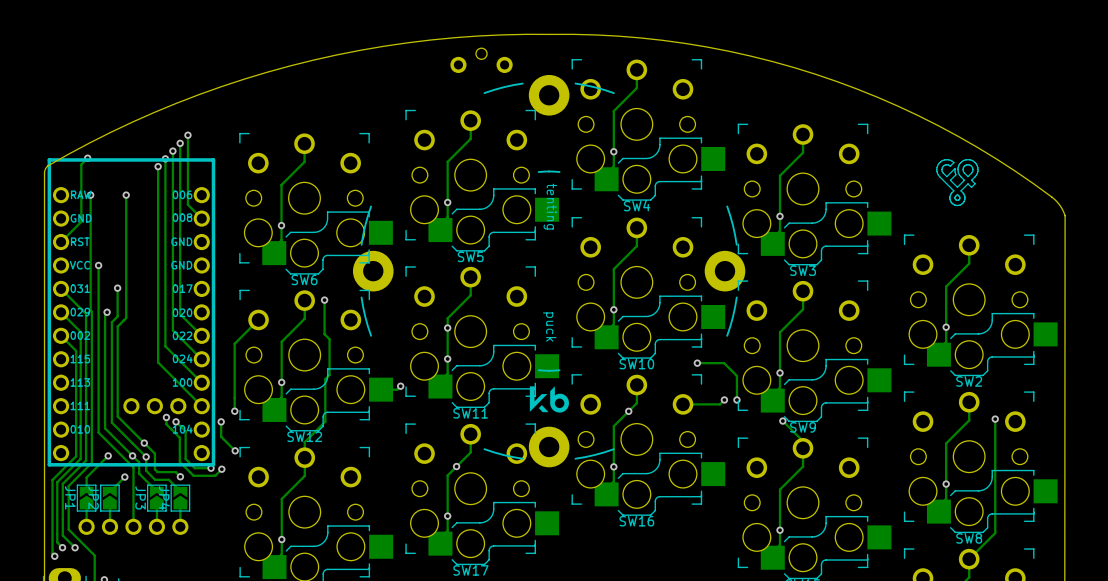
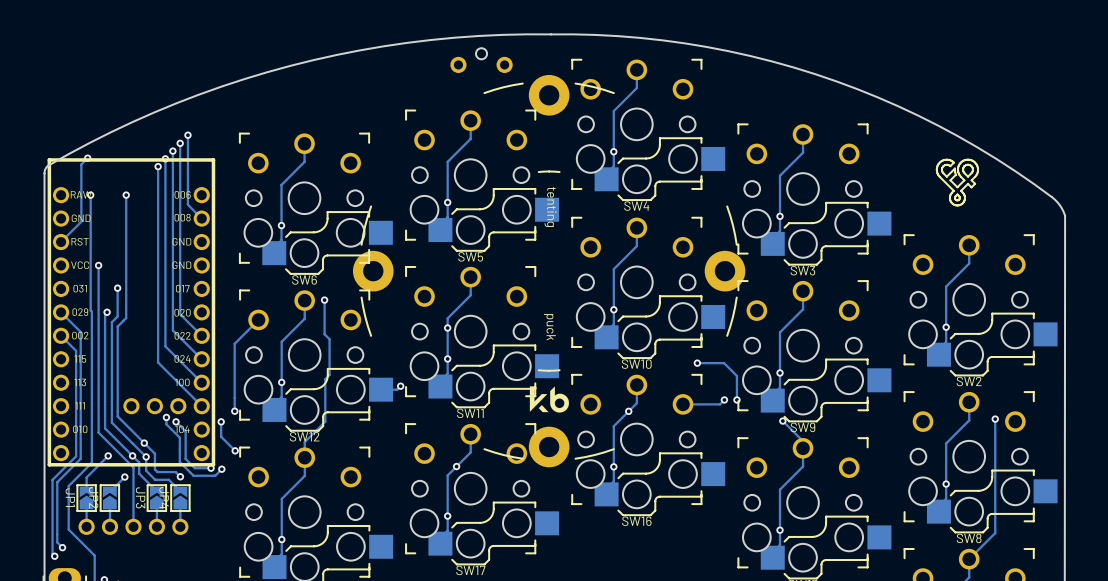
track: (61, 288) (86, 313) (86, 460) (62, 483) (62, 535) (75, 547) -> none
via: (75, 547) -> none

